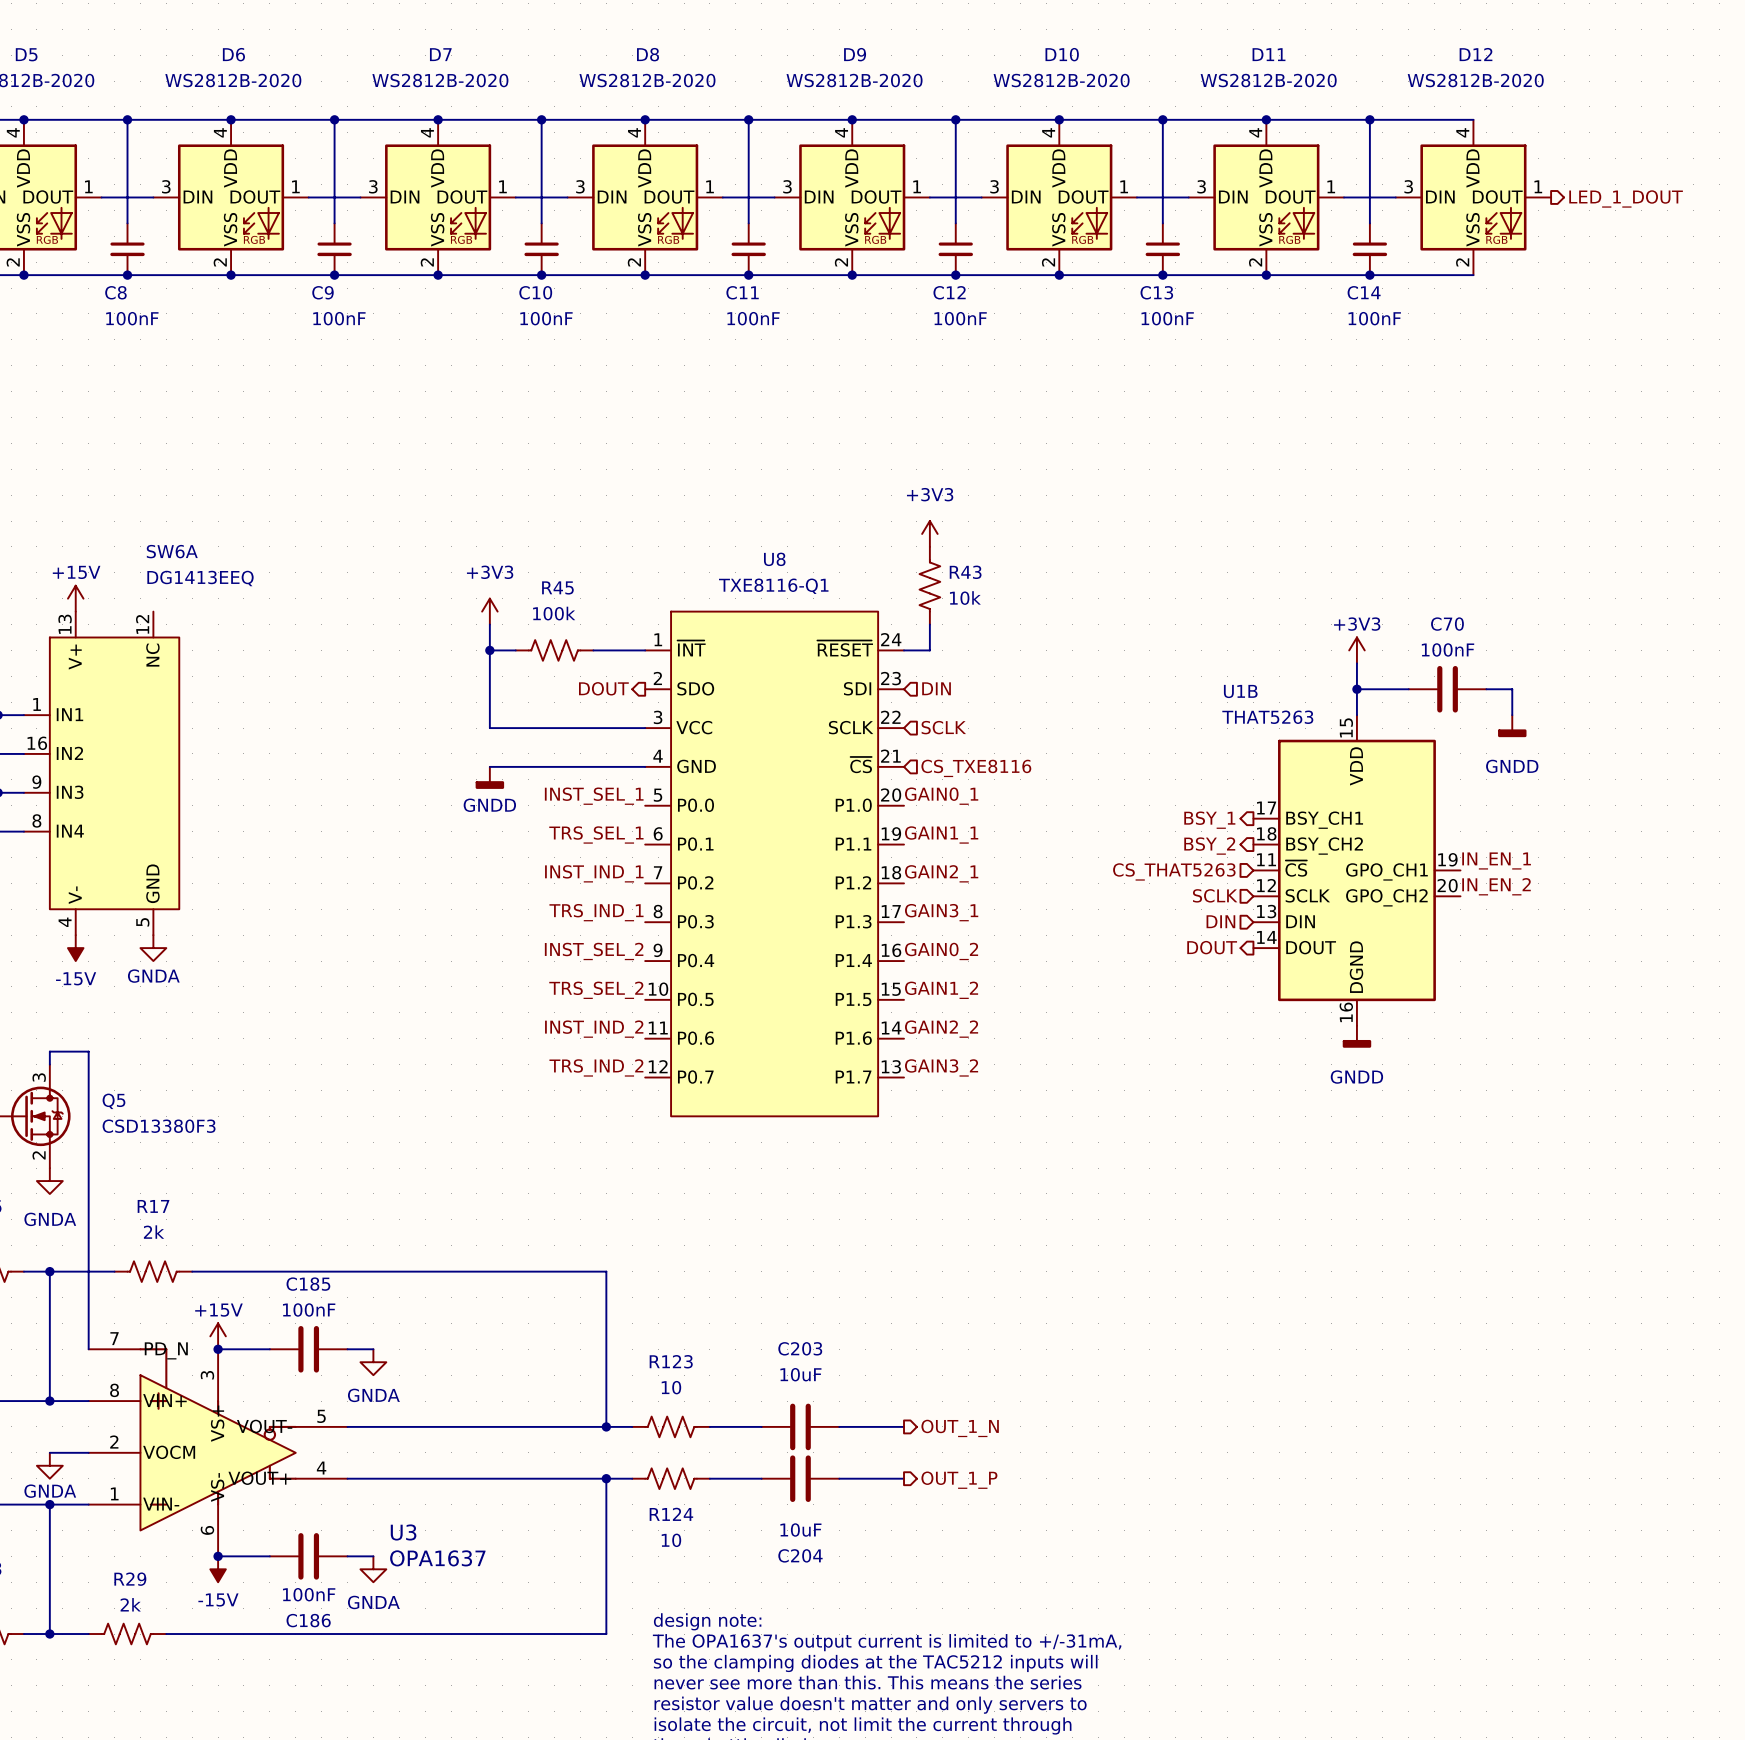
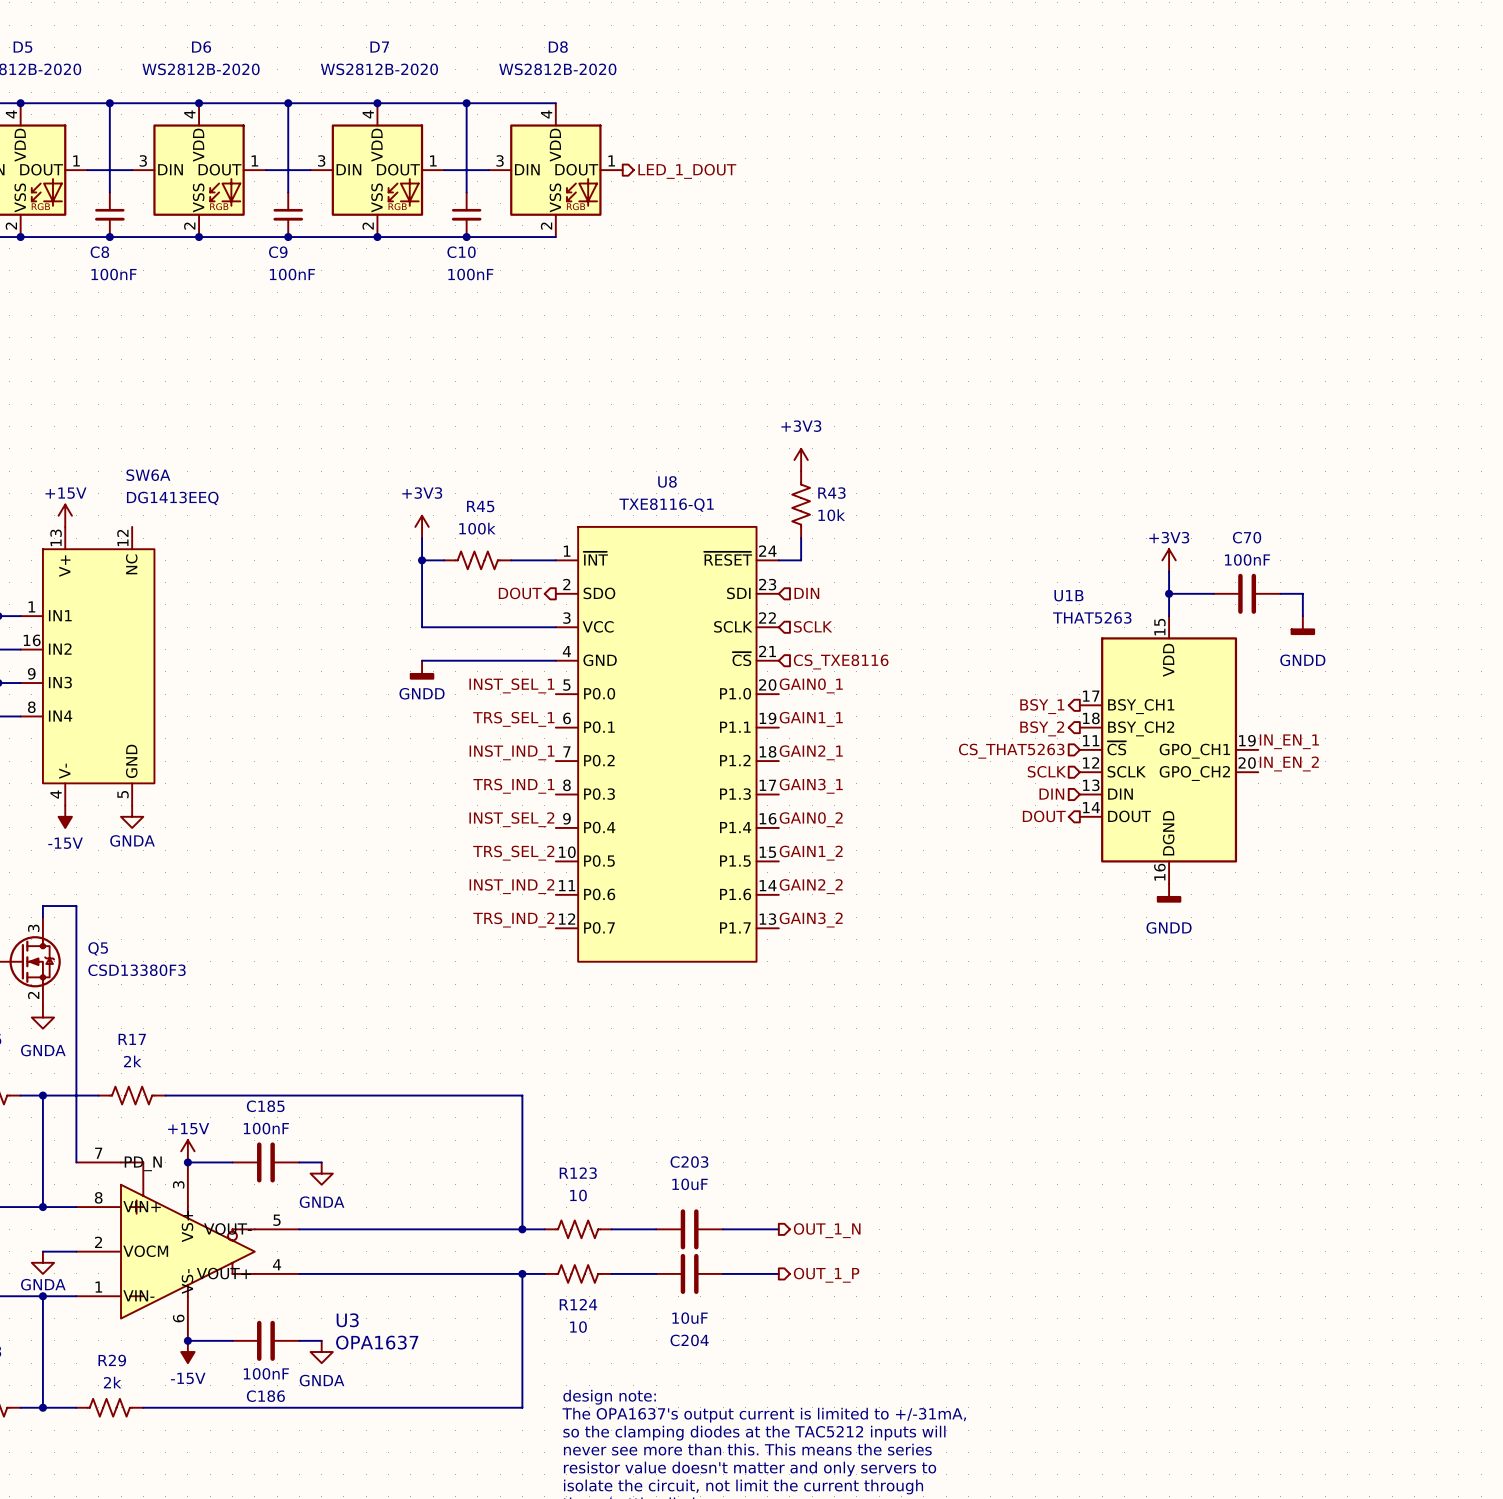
wire: (645, 119) (1473, 119) -> none
junction: (645, 119) -> none
wire: (748, 119) (748, 223) -> none
junction: (748, 119) -> none
junction: (852, 119) -> none
wire: (955, 119) (955, 223) -> none
junction: (955, 119) -> none
junction: (1059, 119) -> none
wire: (1162, 119) (1162, 223) -> none
junction: (1162, 119) -> none
junction: (1266, 119) -> none
wire: (1369, 119) (1369, 223) -> none
junction: (1369, 119) -> none
wire: (722, 197) (774, 197) -> none
D9: WS2812B-2020 (852, 197) -> none
wire: (929, 197) (981, 197) -> none
D10: WS2812B-2020 (1059, 197) -> none
wire: (1136, 197) (1188, 197) -> none
D11: WS2812B-2020 (1266, 197) -> none
wire: (1344, 197) (1395, 197) -> none
D12: WS2812B-2020 (1473, 197) -> none
hierarchical label: none -> LED_1_DOUT (687, 171)
hierarchical label: LED_1_DOUT (1626, 198) -> none
C11: 100nF (748, 249) -> none
C12: 100nF (955, 249) -> none
C13: 100nF (1162, 249) -> none
C14: 100nF (1369, 249) -> none
wire: (645, 275) (1473, 275) -> none
junction: (645, 275) -> none
junction: (748, 275) -> none
junction: (852, 275) -> none
junction: (955, 275) -> none
junction: (1059, 275) -> none
junction: (1162, 275) -> none
junction: (1266, 275) -> none
junction: (1369, 275) -> none

